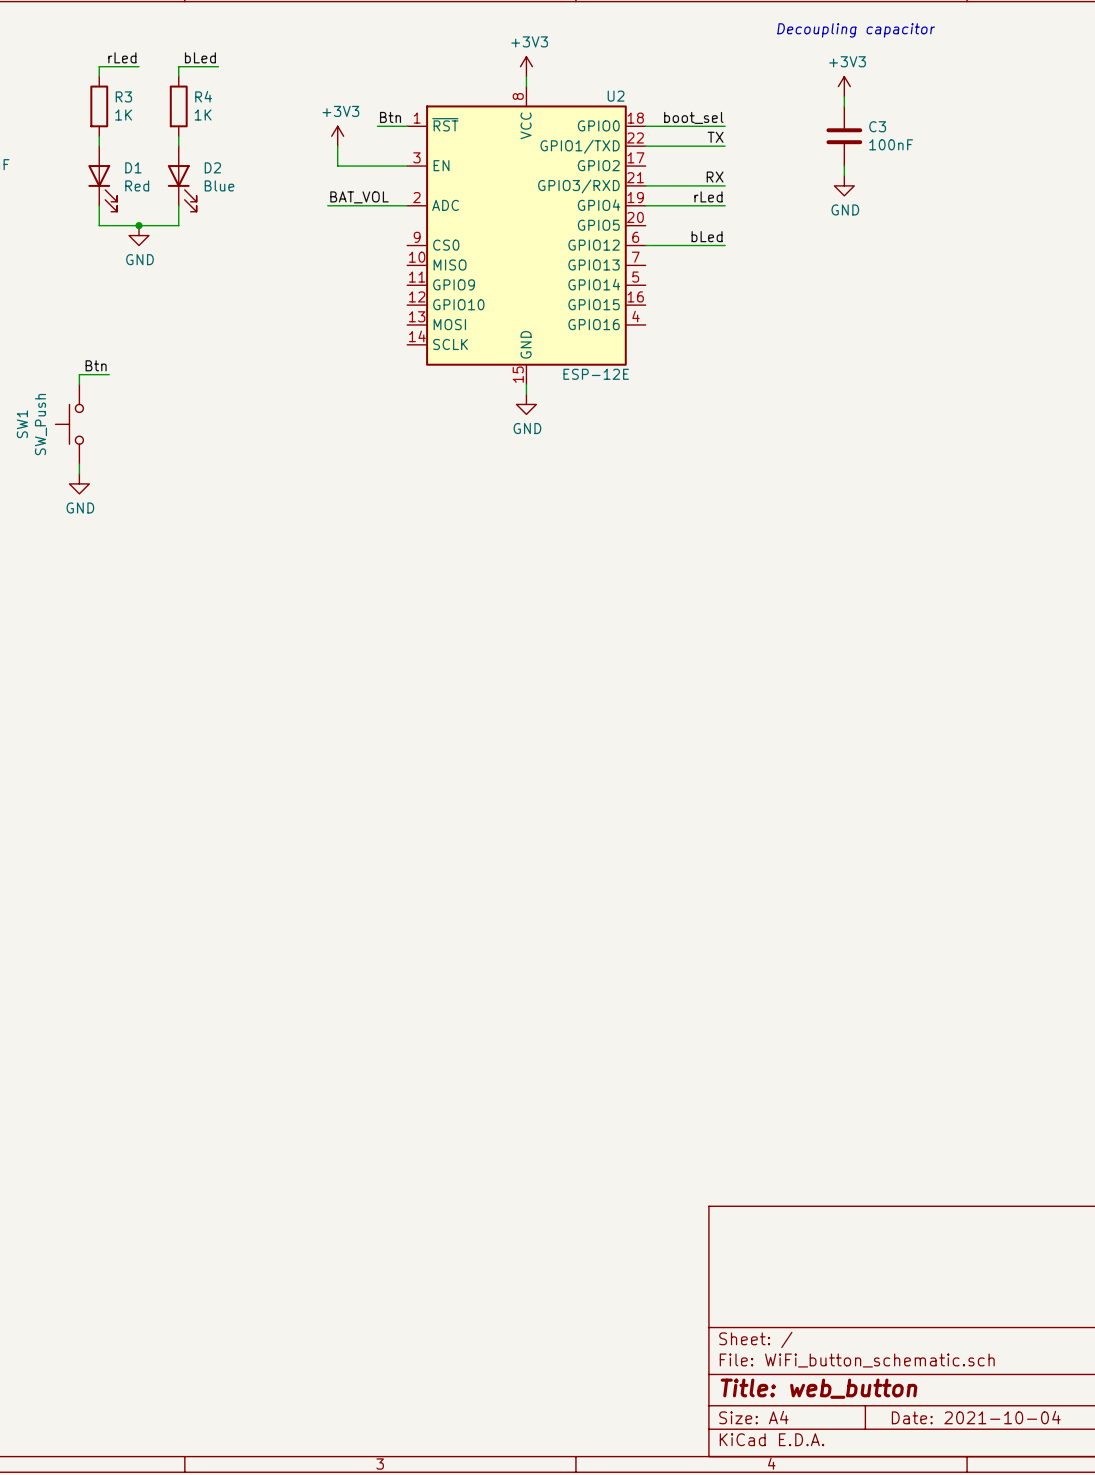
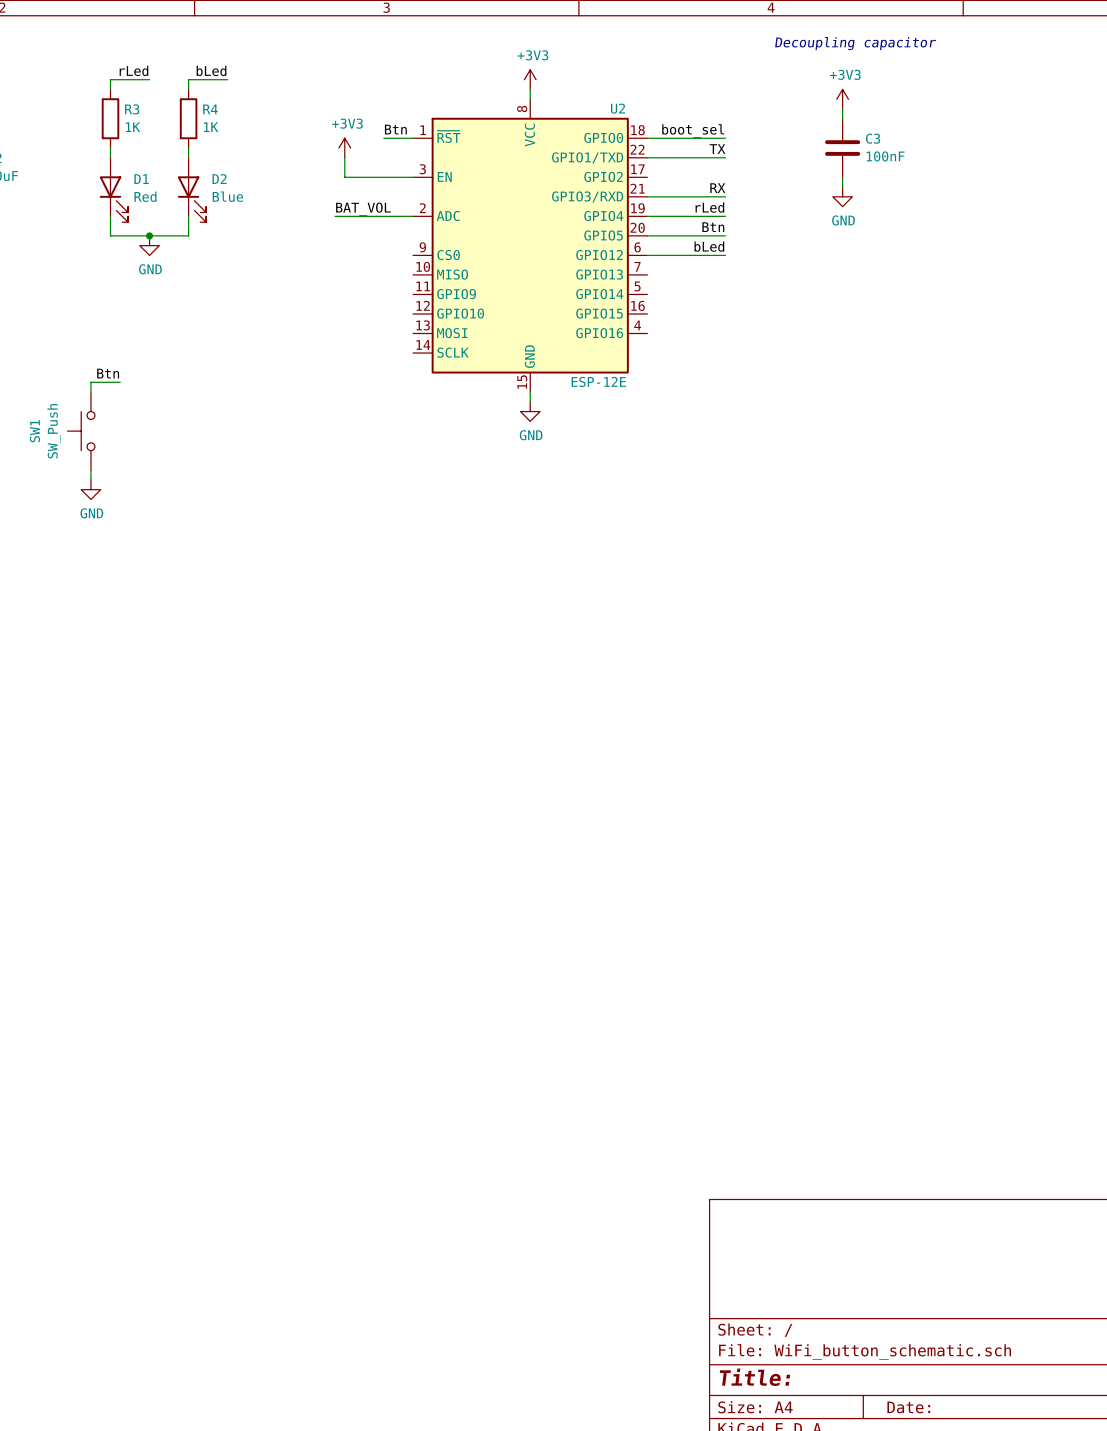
label: none -> Btn (713, 227)
wire: none -> (647, 235) (725, 235)
title block: Title: web_button (819, 1388) -> Title: (754, 1377)
title block: Date: 2021-10-04 (976, 1417) -> Date: (908, 1407)

